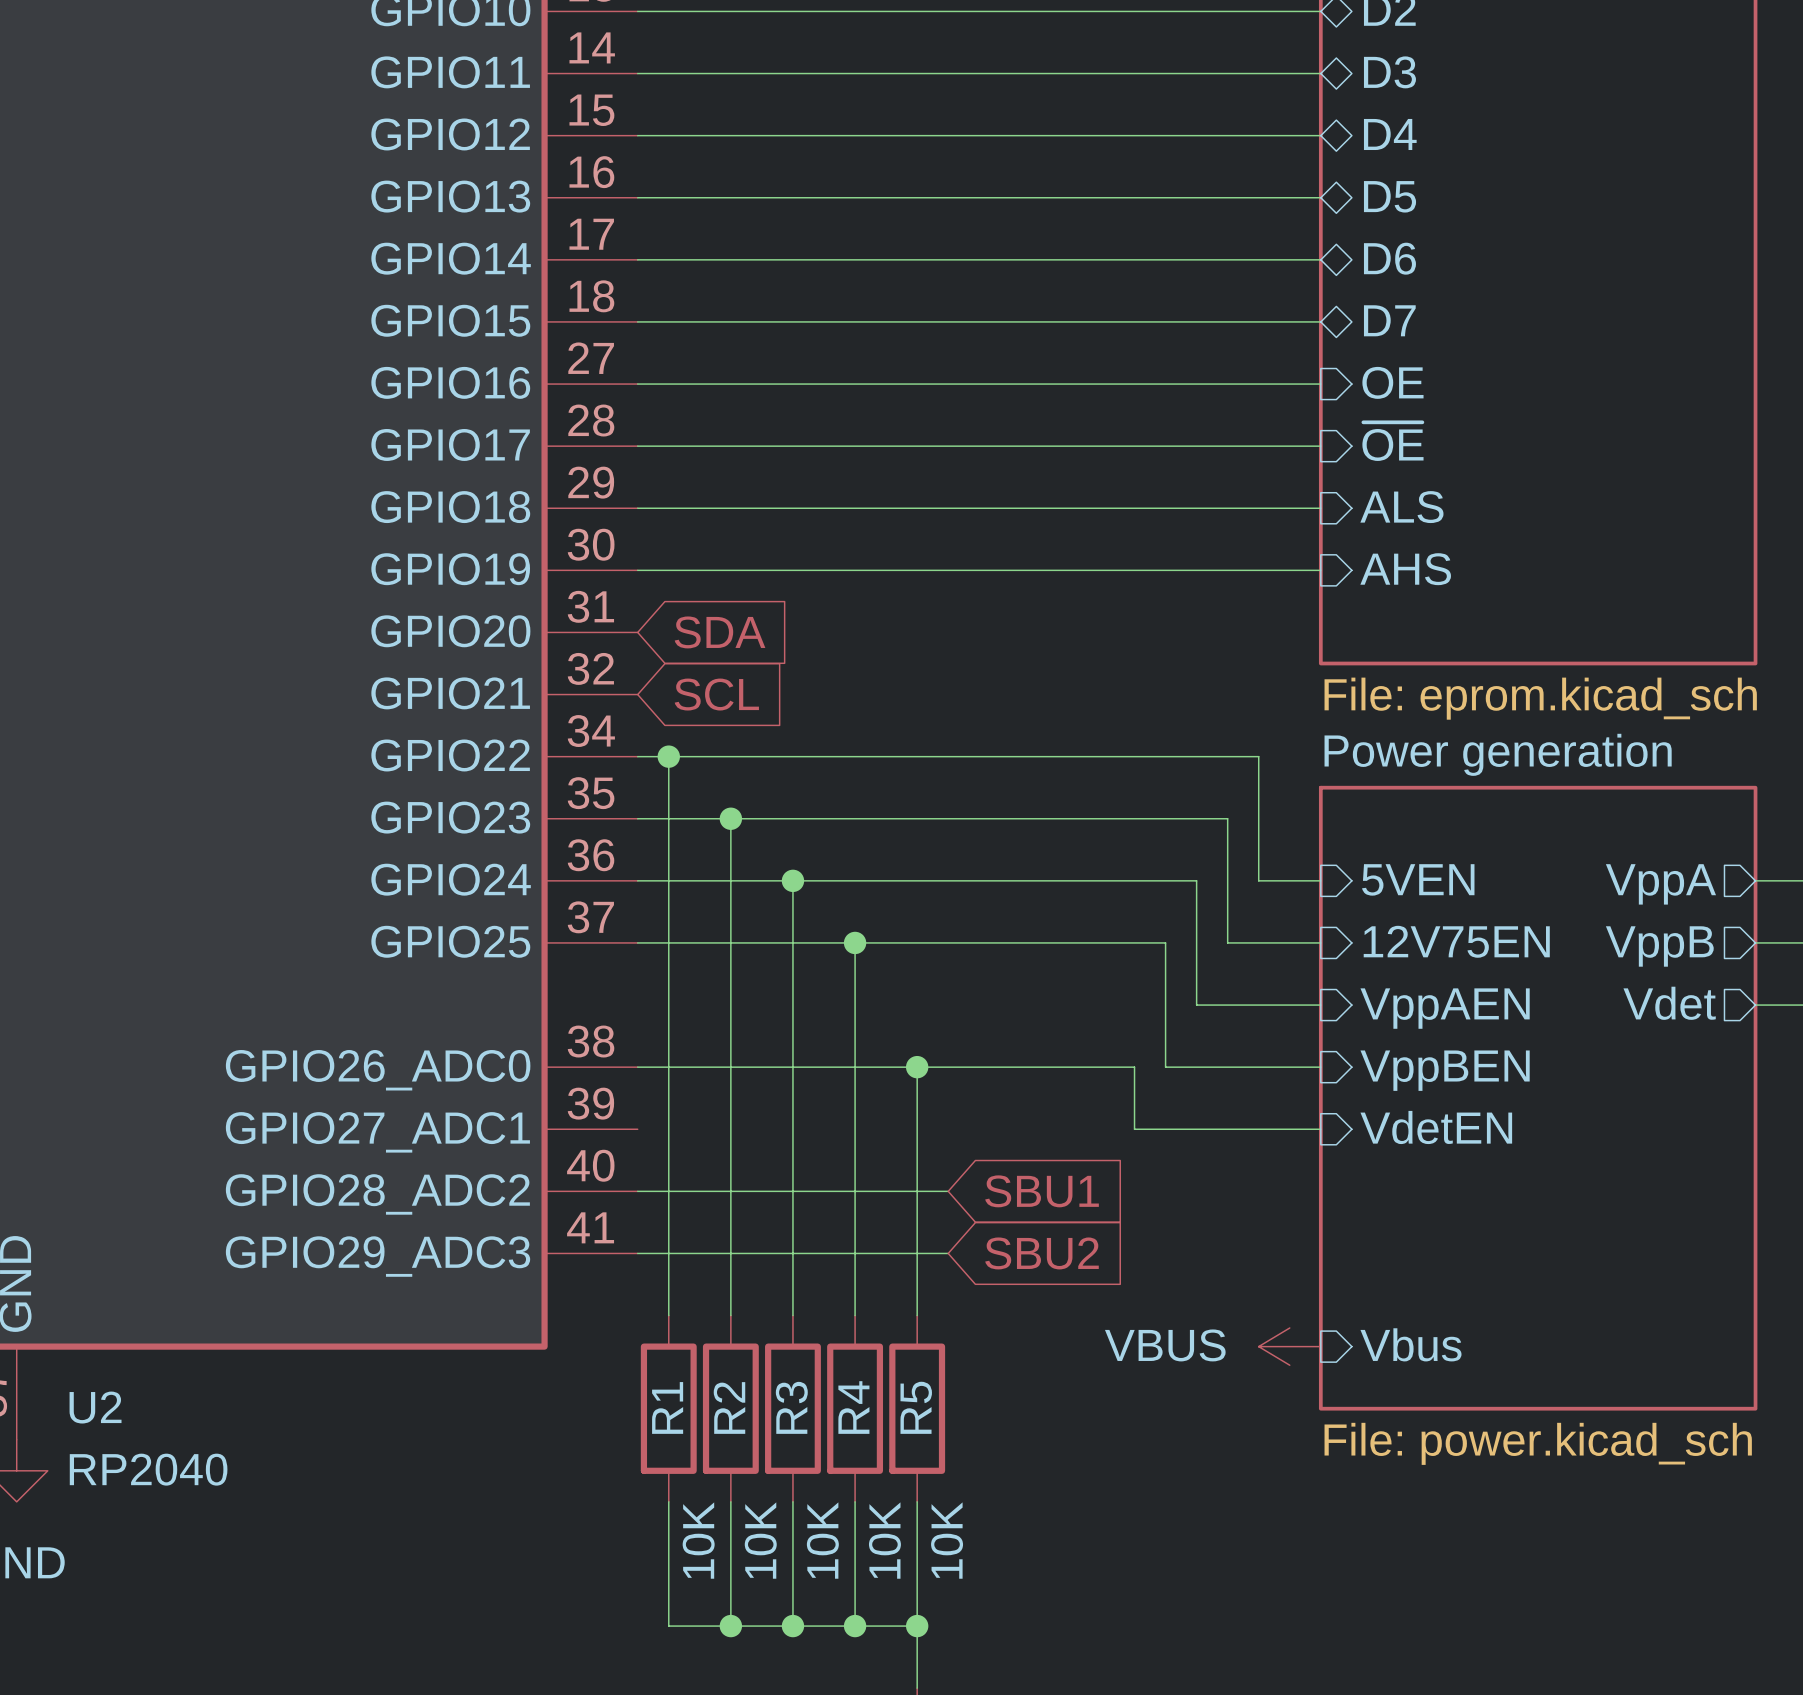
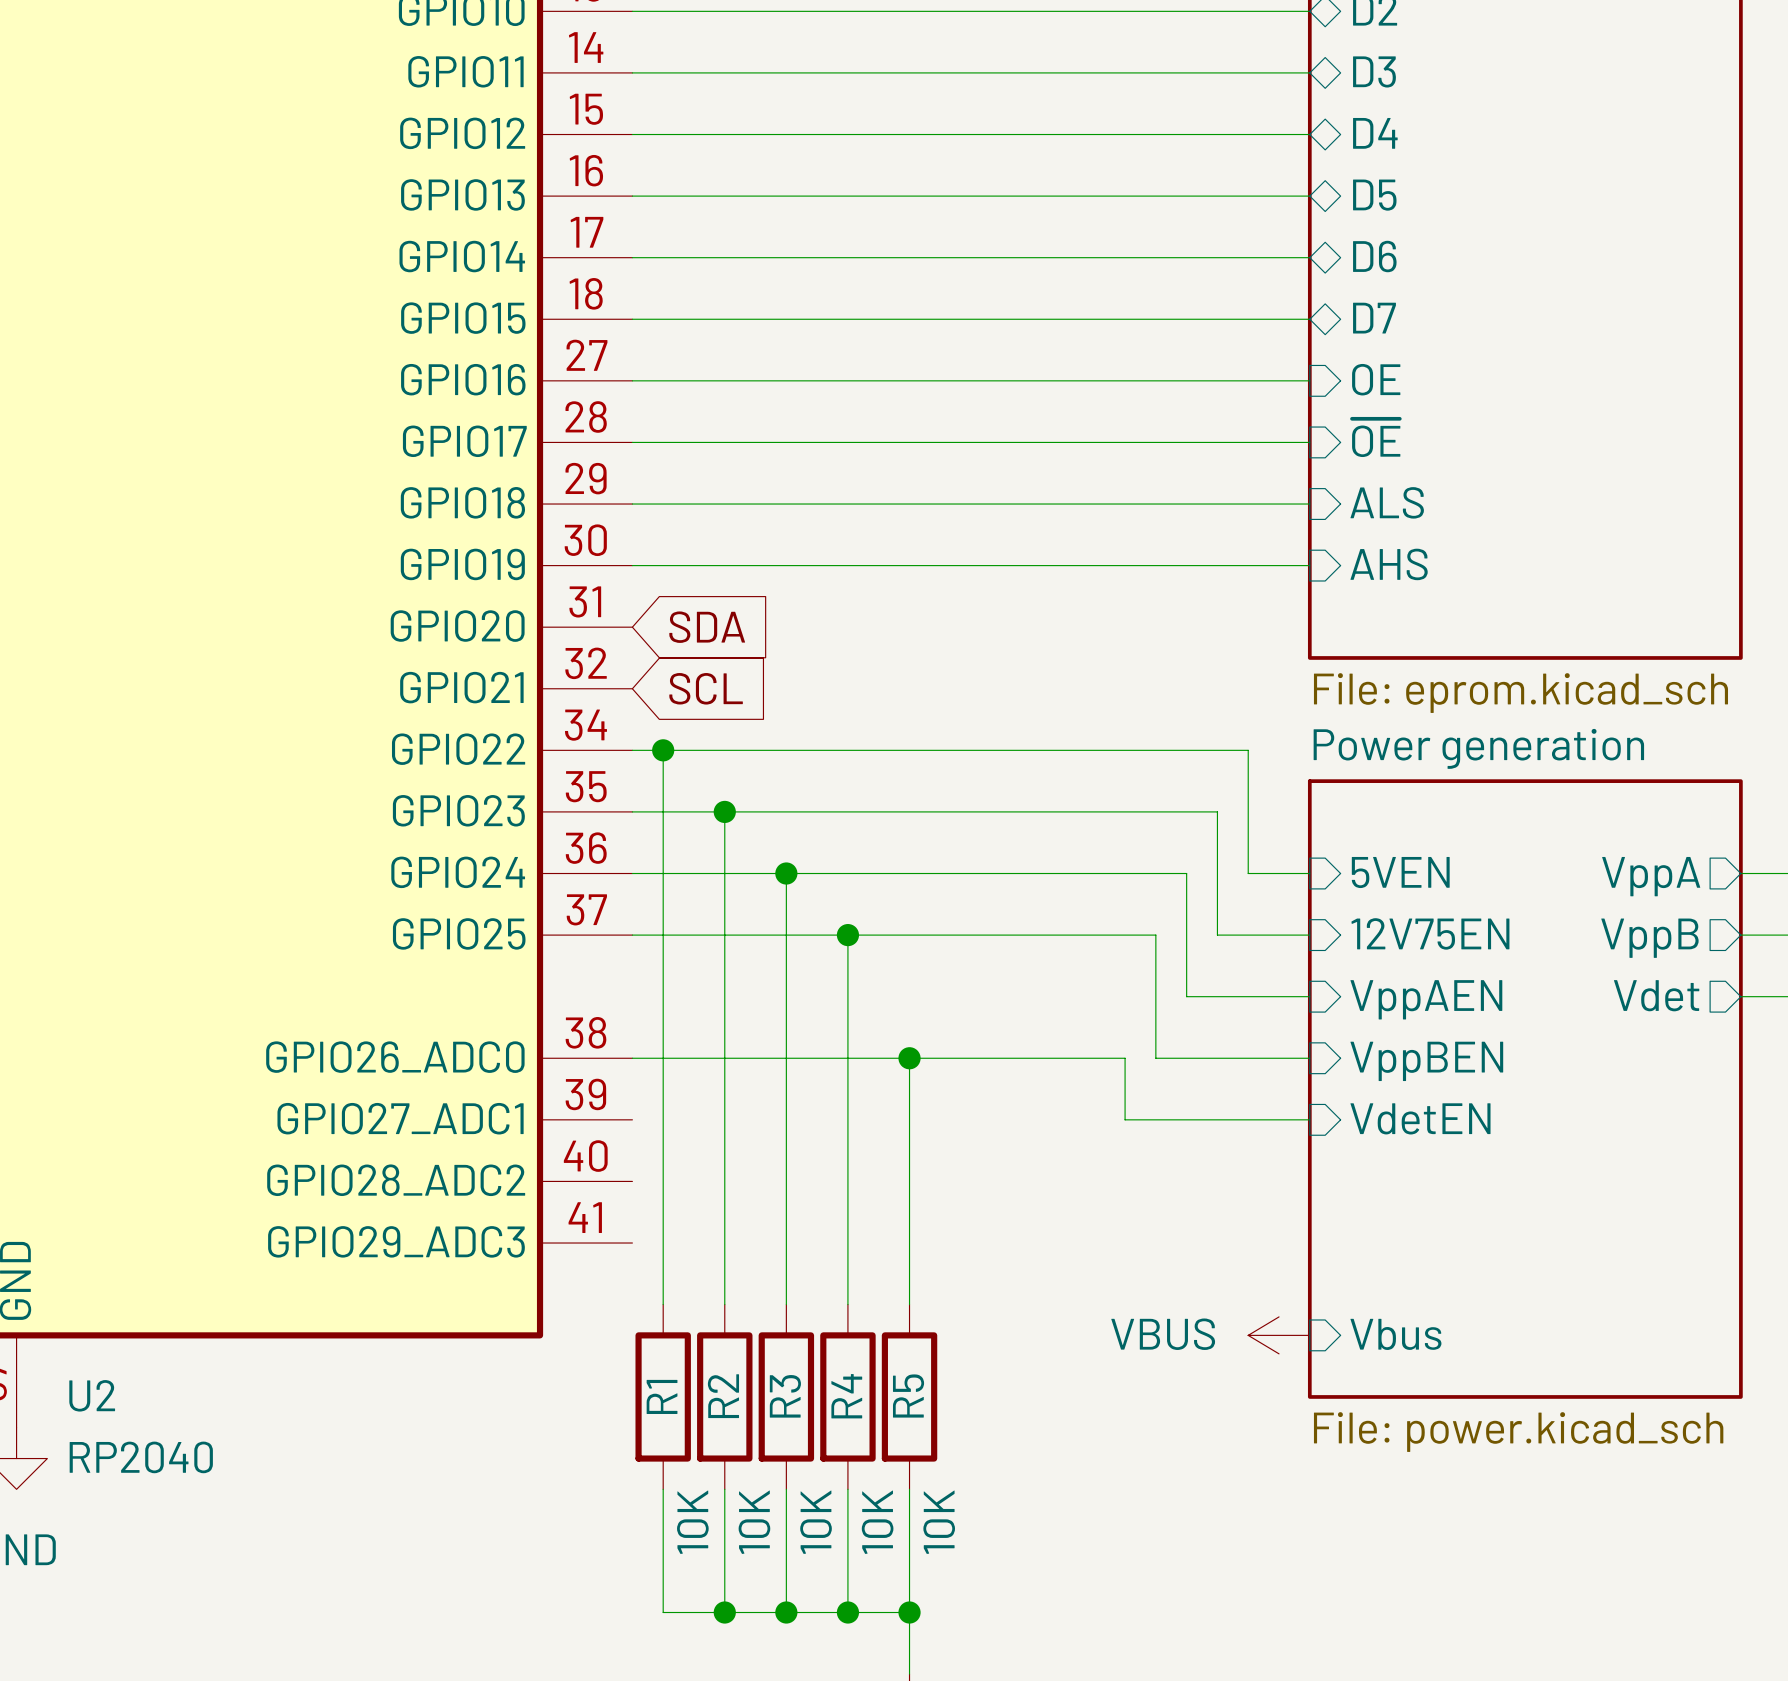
wire: (637, 1191) (948, 1191) -> none
global label: SBU1 (1042, 1191) -> none
wire: (637, 1253) (948, 1253) -> none
global label: SBU2 (1042, 1253) -> none

